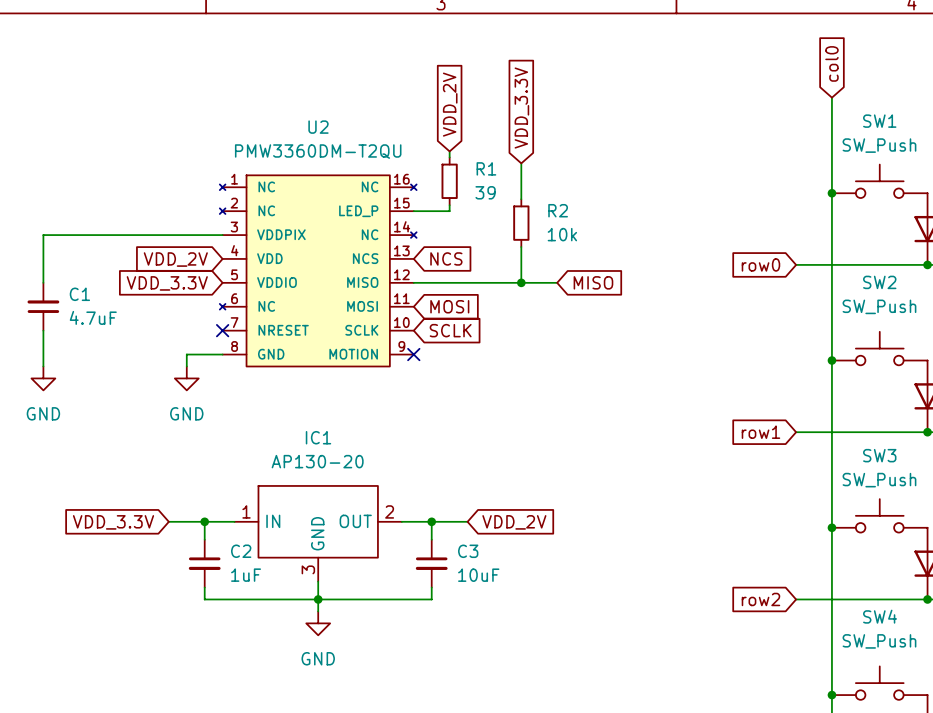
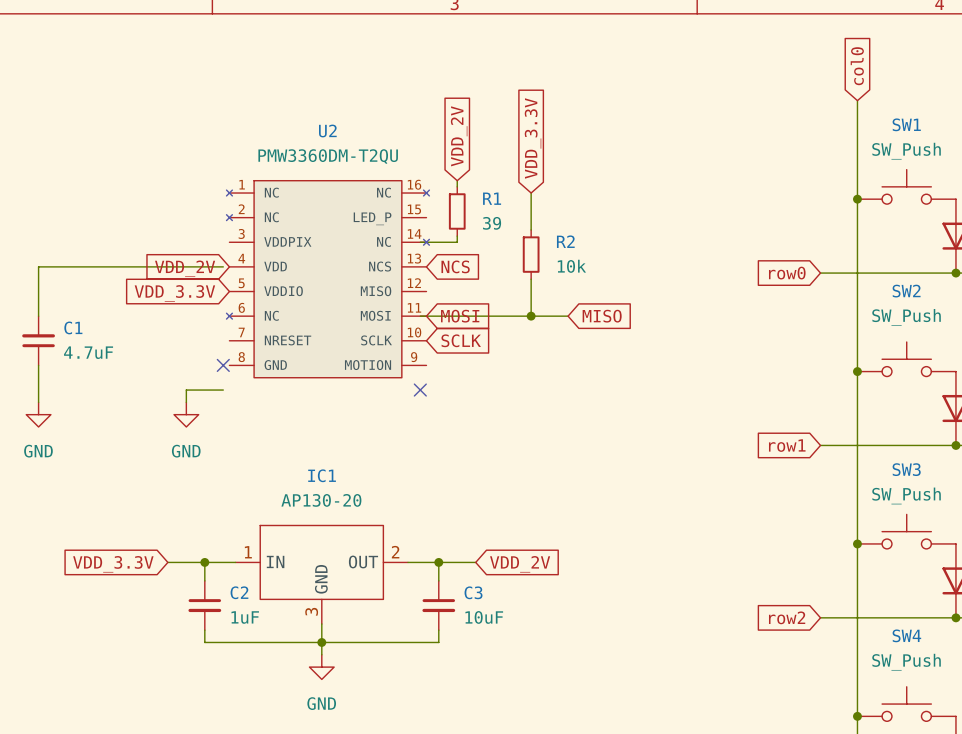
global label position: VDD_2V (450, 104) -> VDD_2V (459, 136)
global label position: VDD_3.3V (521, 108) -> VDD_3.3V (533, 138)
wire: (449, 151) (449, 157) -> (457, 180) (457, 186)
wire: (521, 163) (521, 199) -> (531, 193) (531, 229)
R1 position: (449, 181) -> (457, 211)
wire: (449, 205) (449, 211) (413, 211) -> (457, 236) (457, 242) (420, 242)
R2 position: (521, 223) -> (531, 254)
wire: (222, 235) (43, 235) (43, 282) -> (223, 266) (38, 266) (38, 316)
wire: (521, 247) (521, 282) -> (531, 279) (531, 316)
wire: (413, 282) (557, 282) -> (420, 316) (568, 316)
junction position: (521, 282) -> (531, 316)
global label position: MISO (593, 282) -> MISO (602, 316)
C1 position: (43, 306) -> (38, 340)
wire: (43, 330) (43, 366) -> (38, 365) (38, 402)
no-connect mark position: (222, 330) -> (223, 365)
wire: (222, 354) (186, 354) (186, 366) -> (223, 390) (186, 390) (186, 402)
no-connect mark position: (413, 354) -> (420, 390)
power symbol position: GND (43, 378) -> GND (38, 414)
power symbol position: GND (186, 378) -> GND (186, 414)
wire: (168, 521) (234, 521) -> (167, 562) (235, 562)
wire: (204, 521) (204, 539) -> (204, 562) (204, 580)
junction position: (204, 521) -> (204, 562)
wire: (401, 521) (467, 521) -> (408, 562) (475, 562)
wire: (431, 521) (431, 539) -> (438, 562) (438, 580)
junction position: (431, 521) -> (438, 562)
global label position: VDD_3.3V (113, 522) -> VDD_3.3V (113, 564)
global label position: VDD_2V (514, 522) -> VDD_2V (520, 564)
IC1 position: (318, 533) -> (321, 574)
C2 position: (204, 563) -> (204, 605)
C3 position: (431, 563) -> (438, 605)
wire: (318, 581) (318, 611) -> (321, 624) (321, 654)
wire: (204, 587) (204, 599) (431, 599) (431, 587) -> (204, 630) (204, 642) (438, 642) (438, 630)
junction position: (318, 599) -> (321, 642)
power symbol position: GND (318, 623) -> GND (321, 667)

